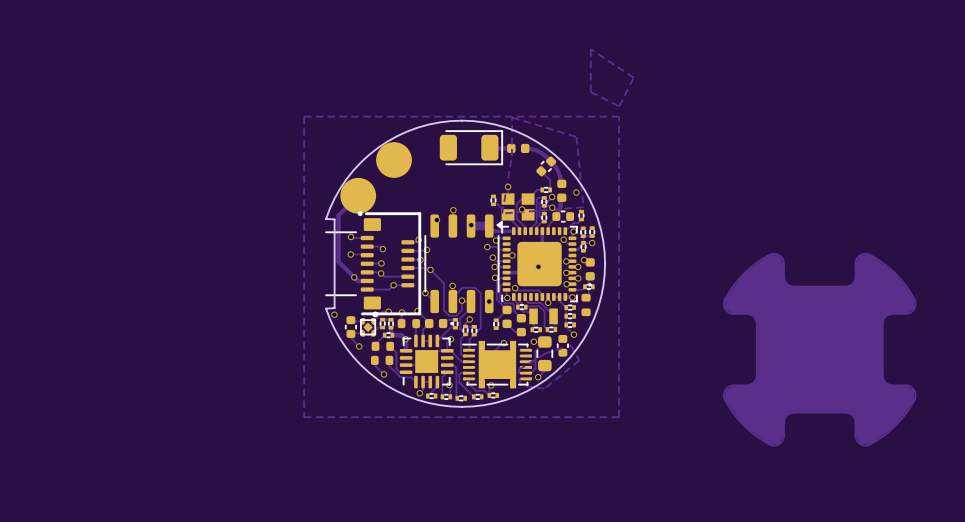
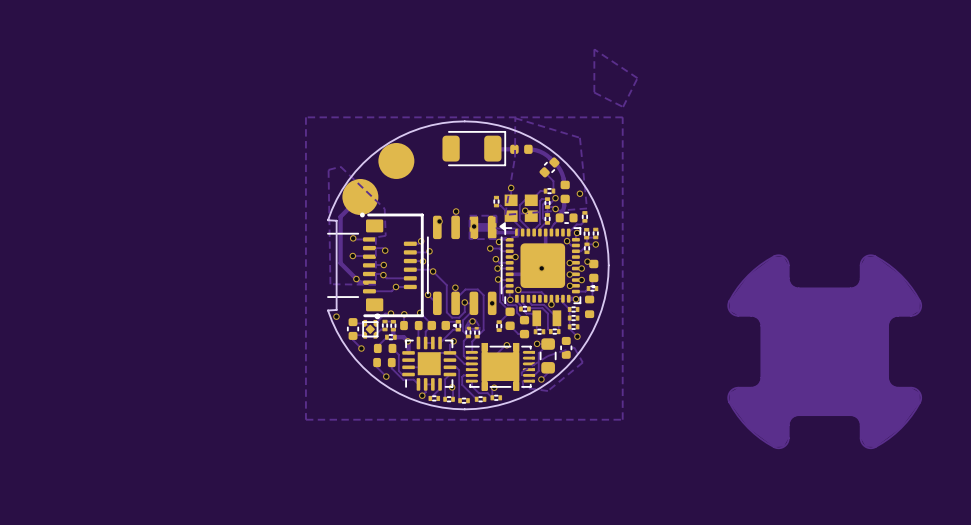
zone outline: none -> (340, 166) (384, 208) (385, 235) (375, 237) (375, 284) (330, 284) (328, 169) (340, 166)
zone outline: none -> (496, 215) (469, 215) (469, 239) (518, 236) (518, 228) (496, 228) (496, 215)
zone outline: none -> (475, 319) (469, 319) (465, 330) (479, 330) (475, 319)

